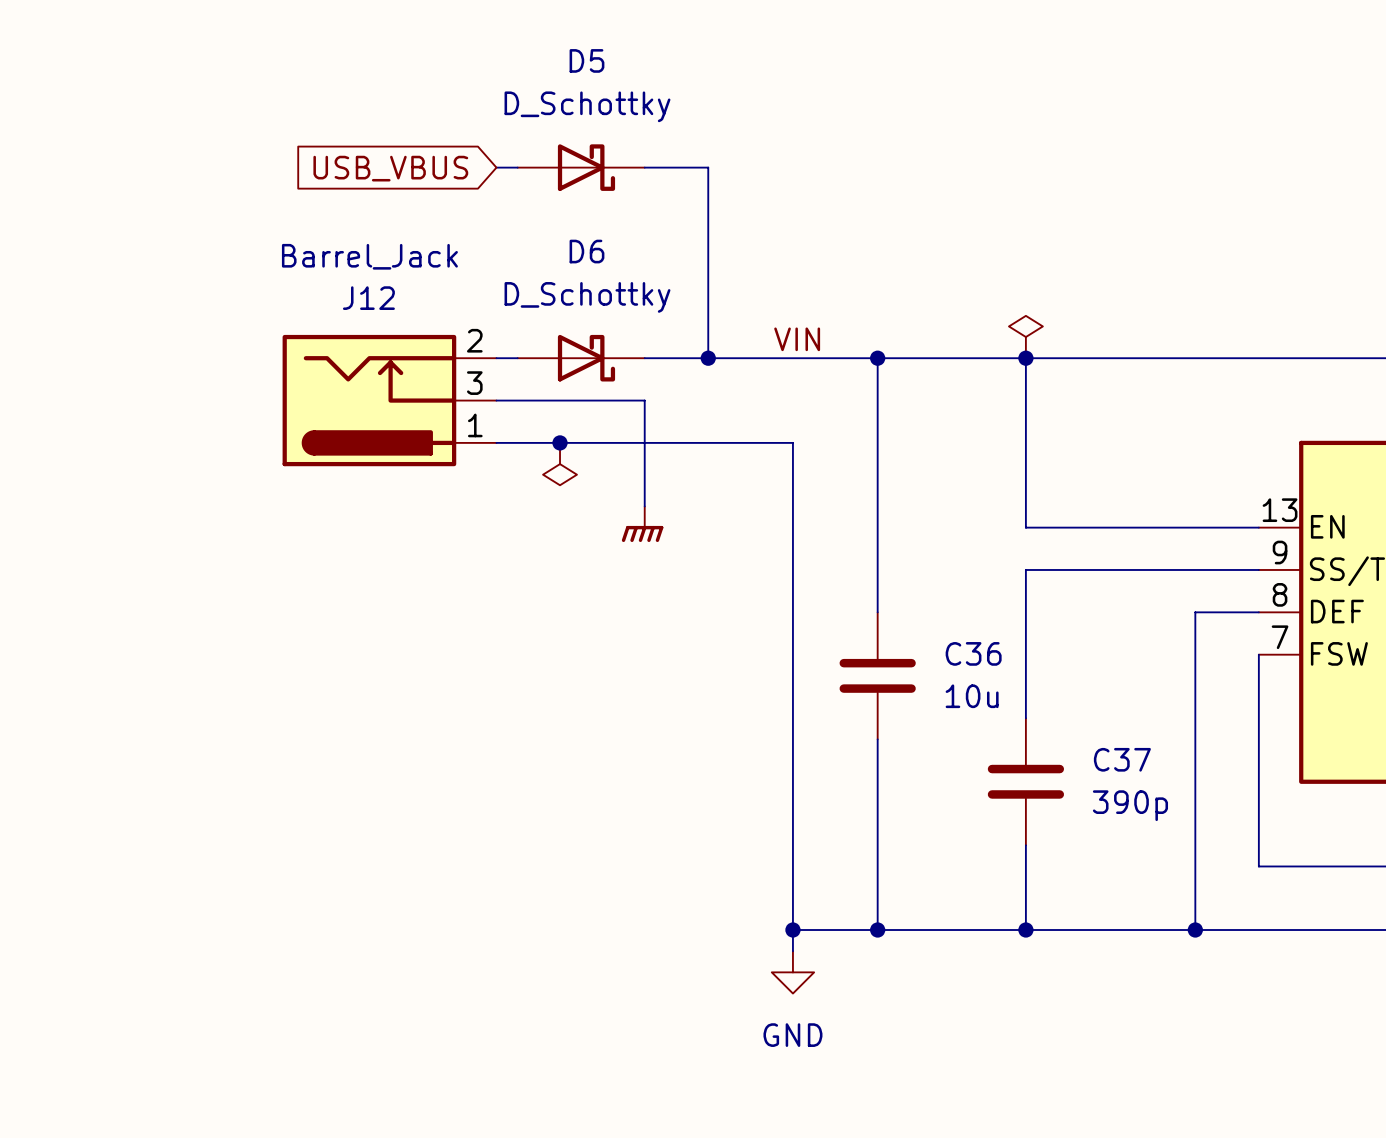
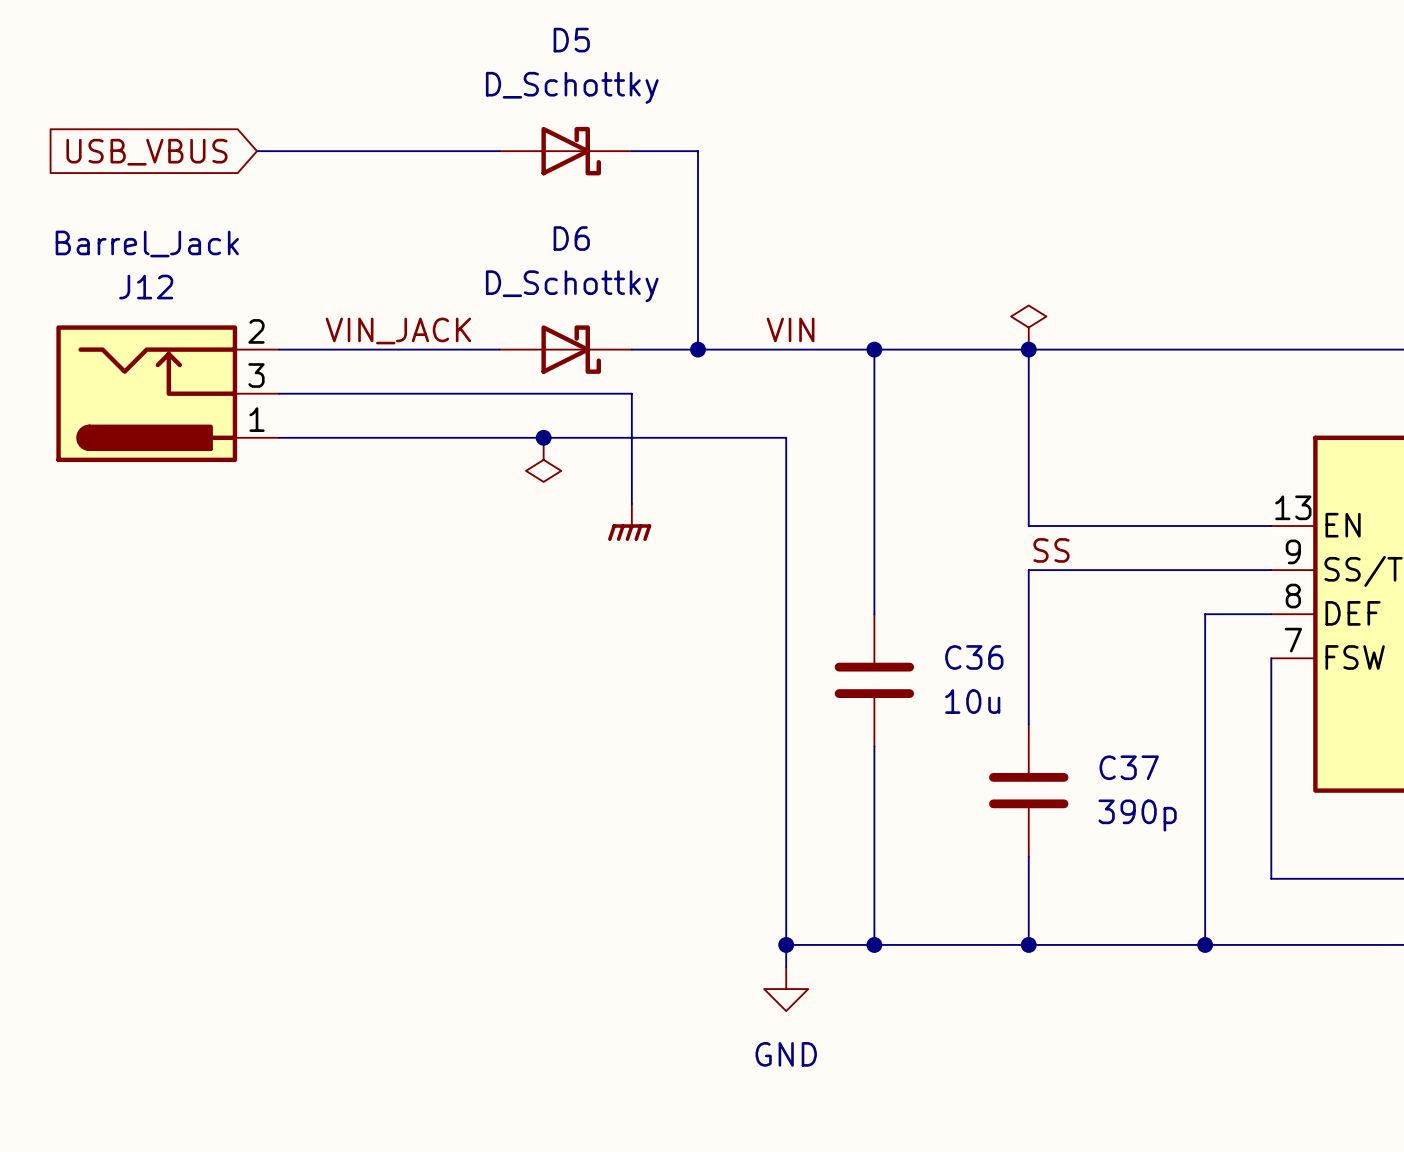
wire: none -> (257, 151) (477, 151)
global label position: USB_VBUS (390, 168) -> USB_VBUS (146, 152)
label: none -> VIN_JACK (398, 330)
J12 position: (389, 400) -> (167, 393)
label: none -> SS (1051, 550)

